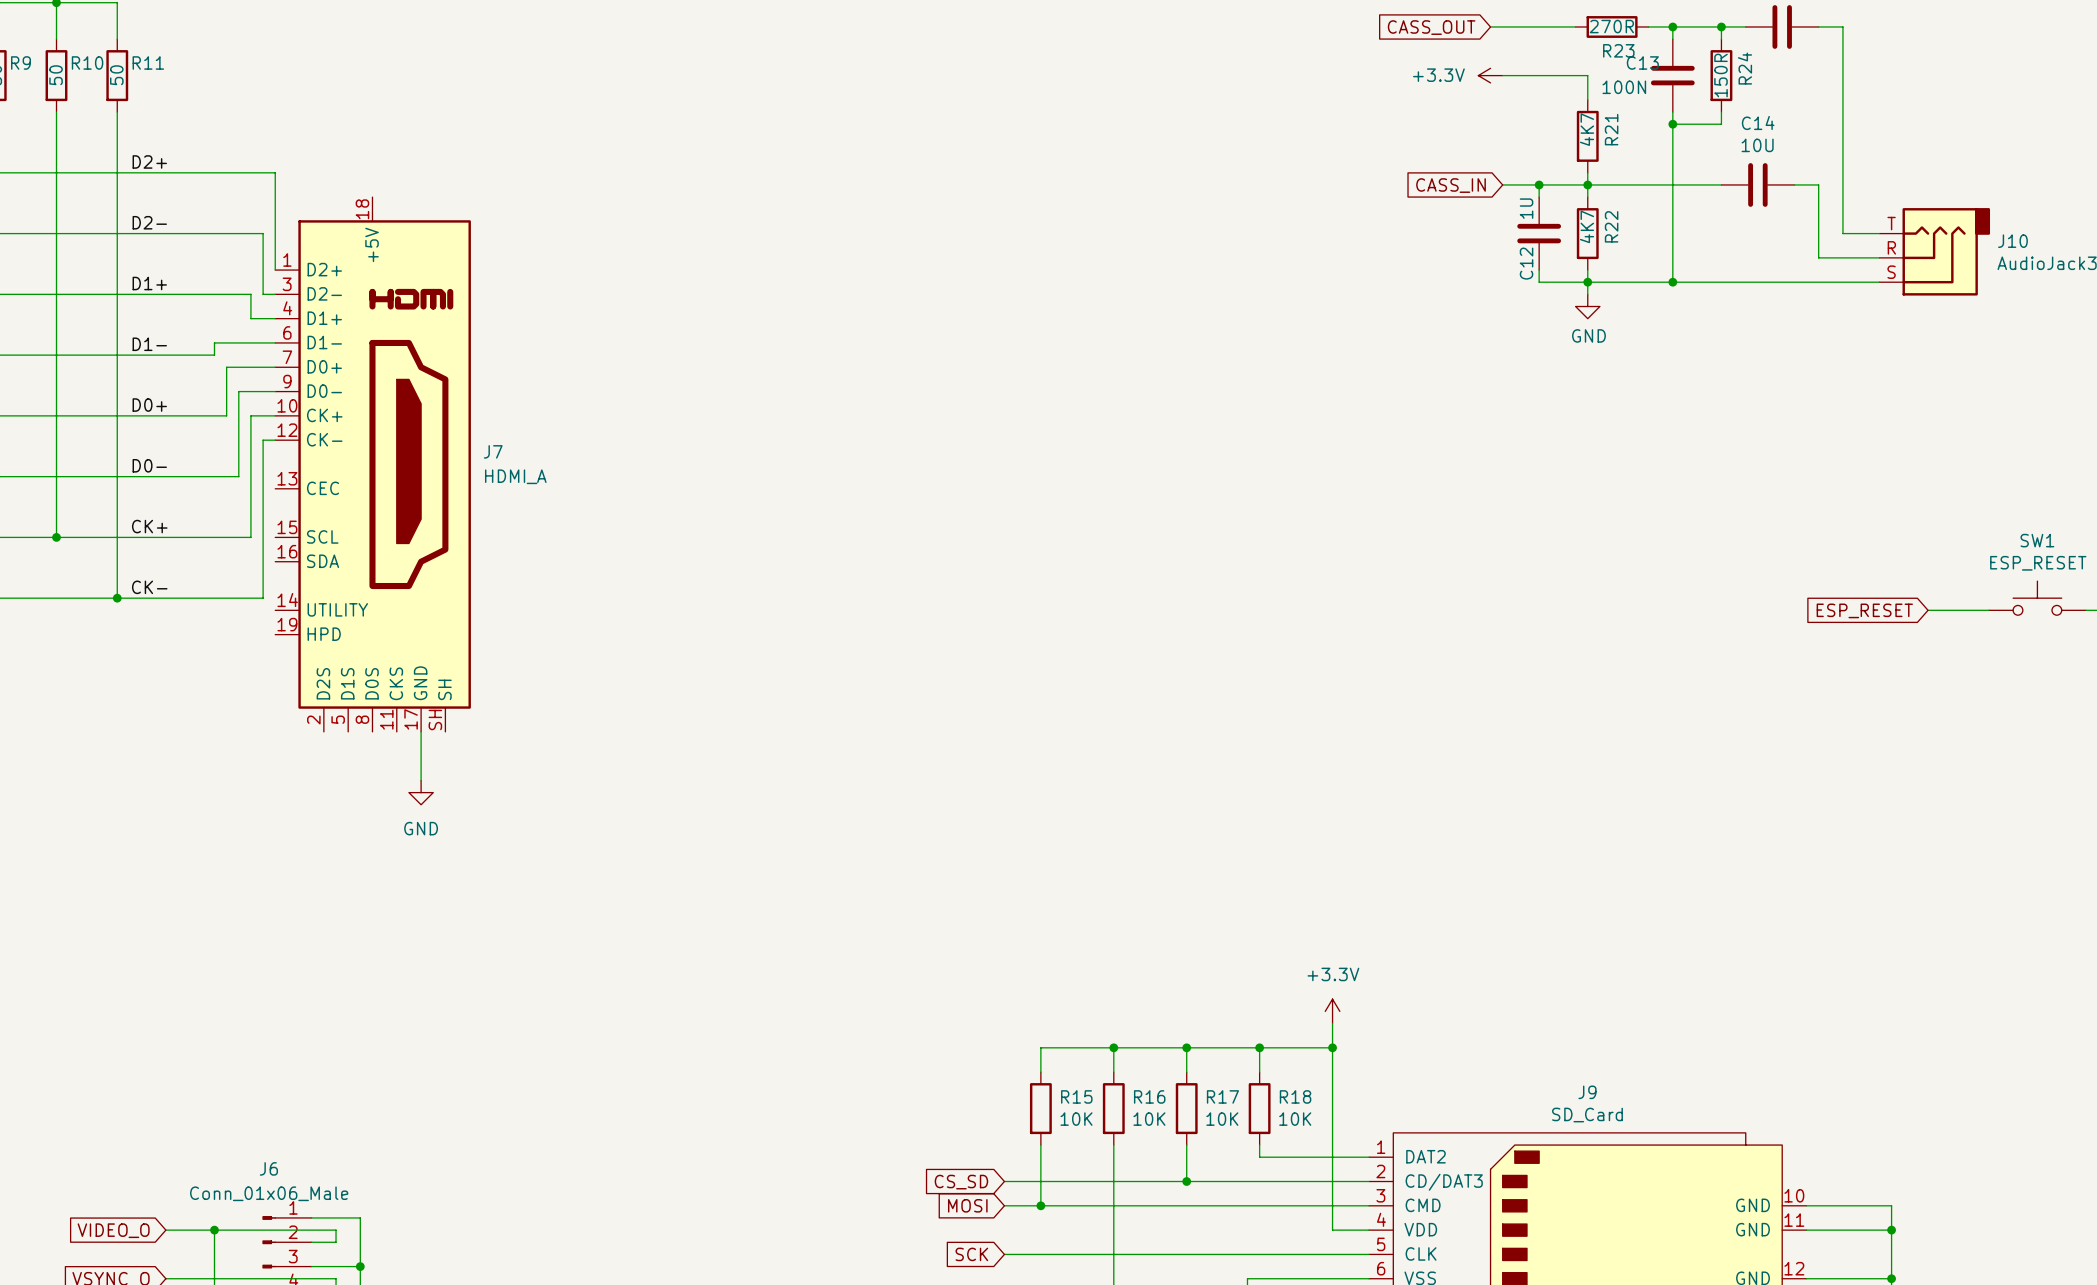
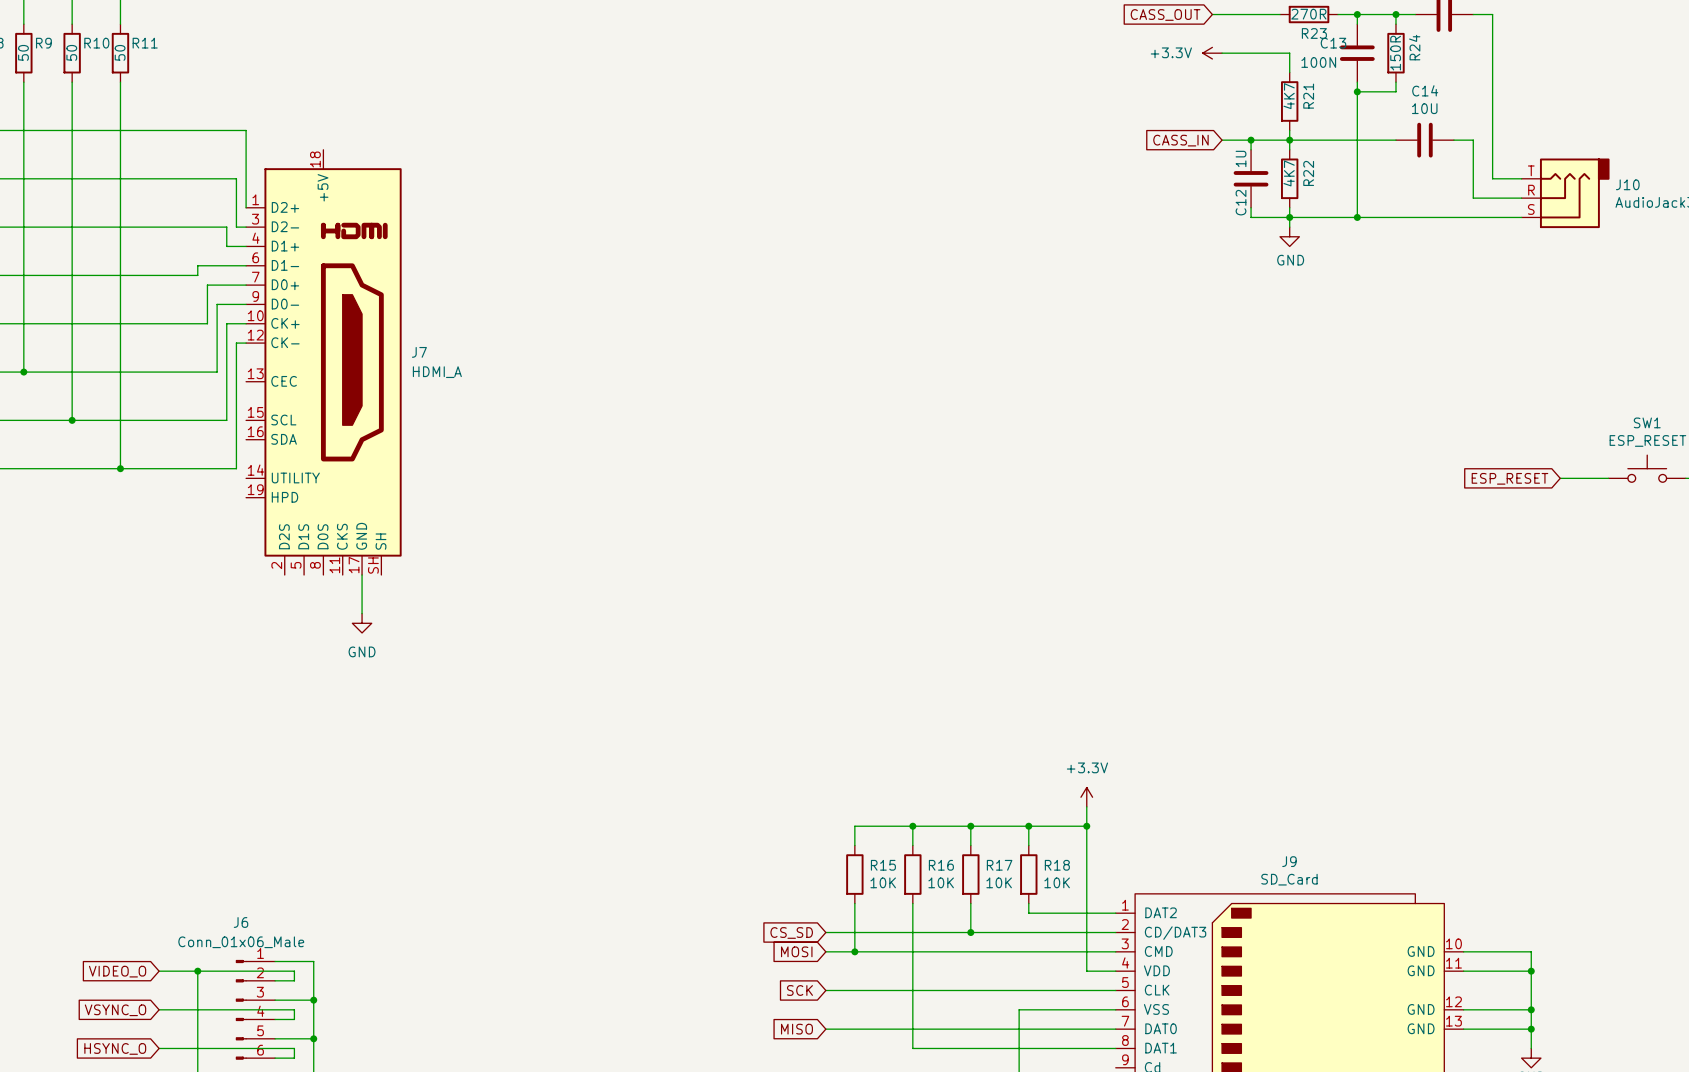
label: D2+ (149, 161) -> none
label: D2- (149, 222) -> none
label: D1+ (149, 283) -> none
label: D1- (149, 344) -> none
label: D0+ (149, 405) -> none
label: D0- (149, 465) -> none
label: CK+ (149, 526) -> none
label: CK- (149, 587) -> none

